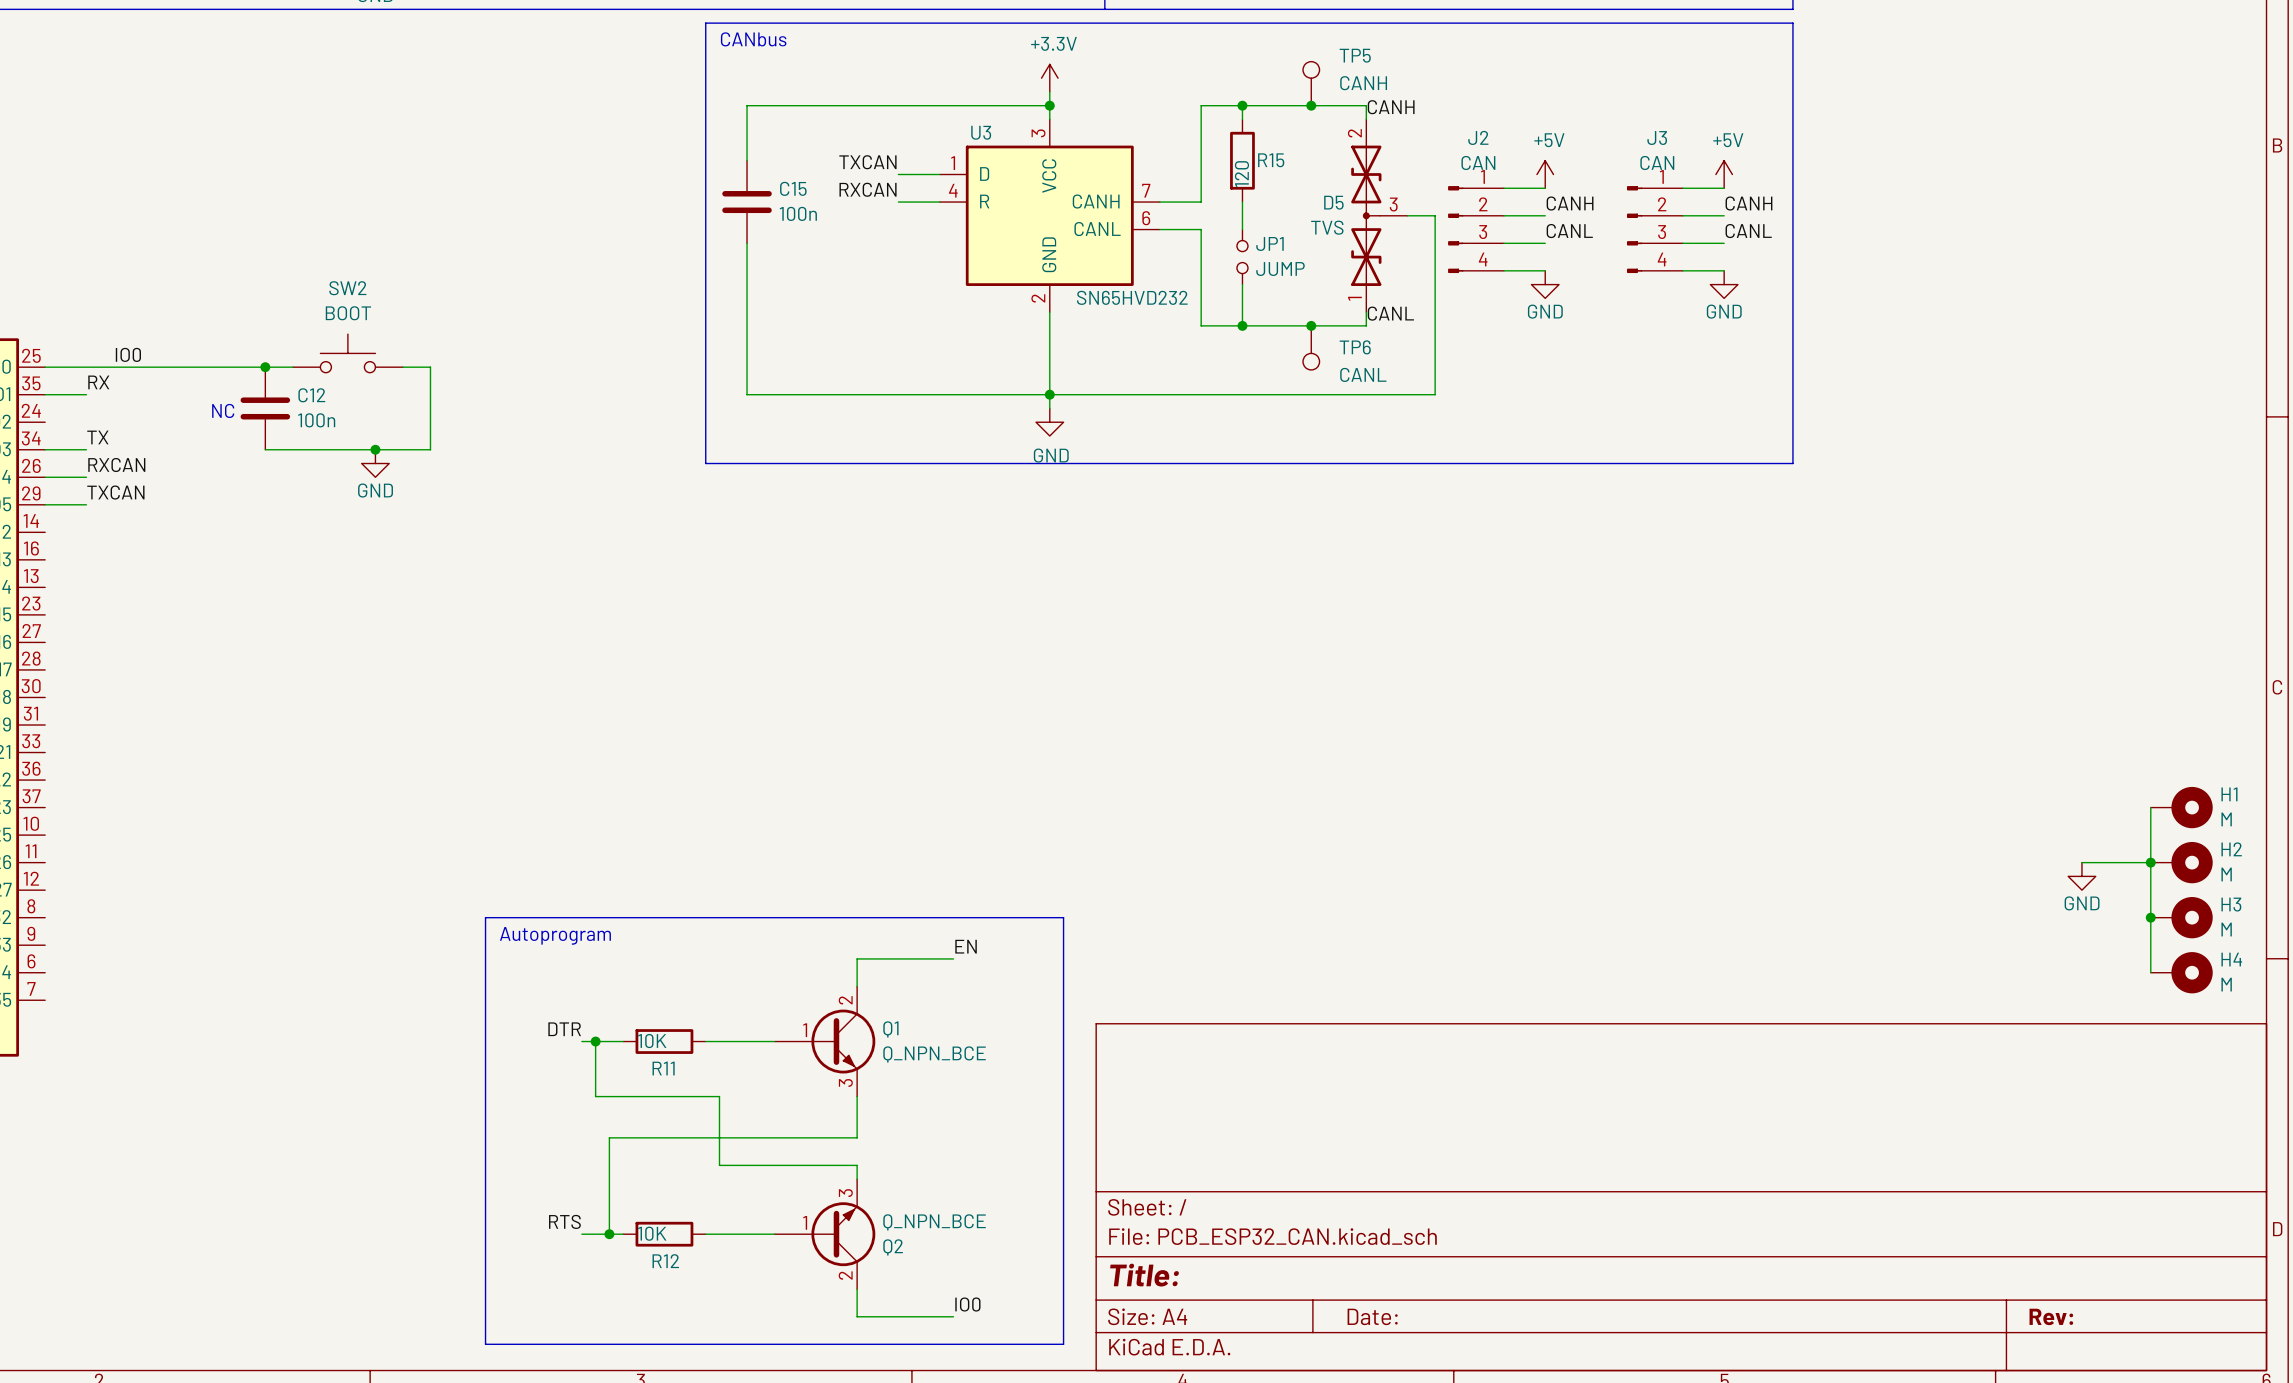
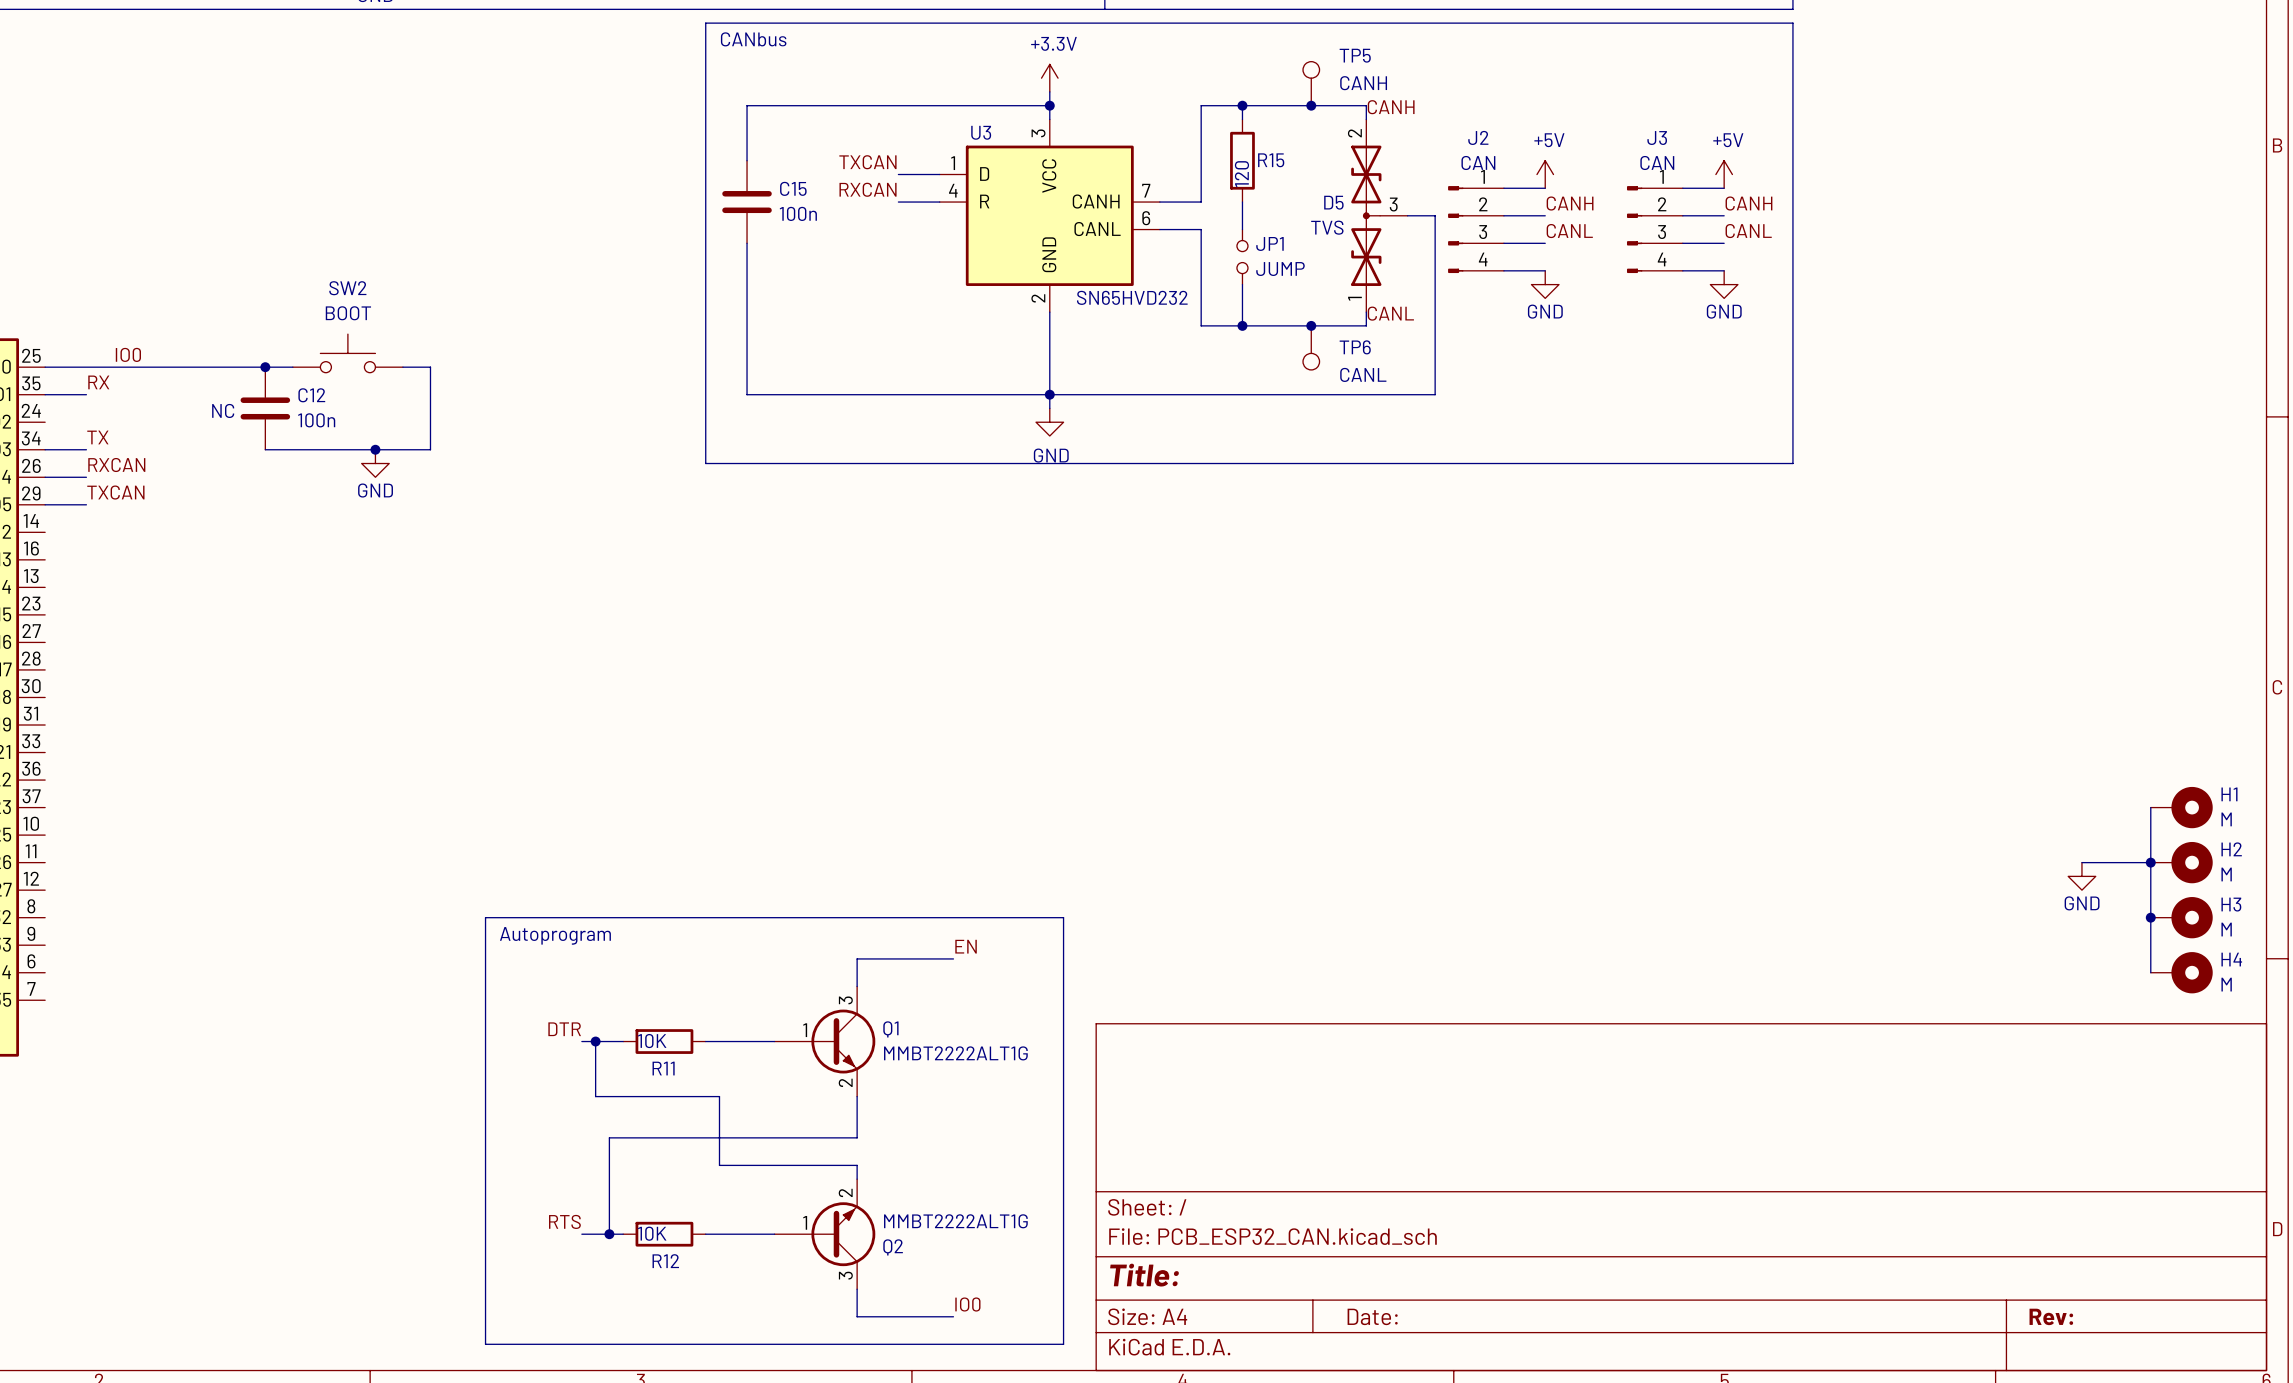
Q1 pin number: 2 (845, 1000) -> 3 (845, 1000)
Q1 value: Q_NPN_BCE (934, 1054) -> MMBT2222ALT1G (955, 1053)
Q1 pin number: 3 (845, 1082) -> 2 (845, 1082)
Q2 pin number: 3 (845, 1193) -> 2 (845, 1192)
Q2 value: Q_NPN_BCE (934, 1222) -> MMBT2222ALT1G (955, 1221)
Q2 pin number: 2 (845, 1275) -> 3 (845, 1275)

